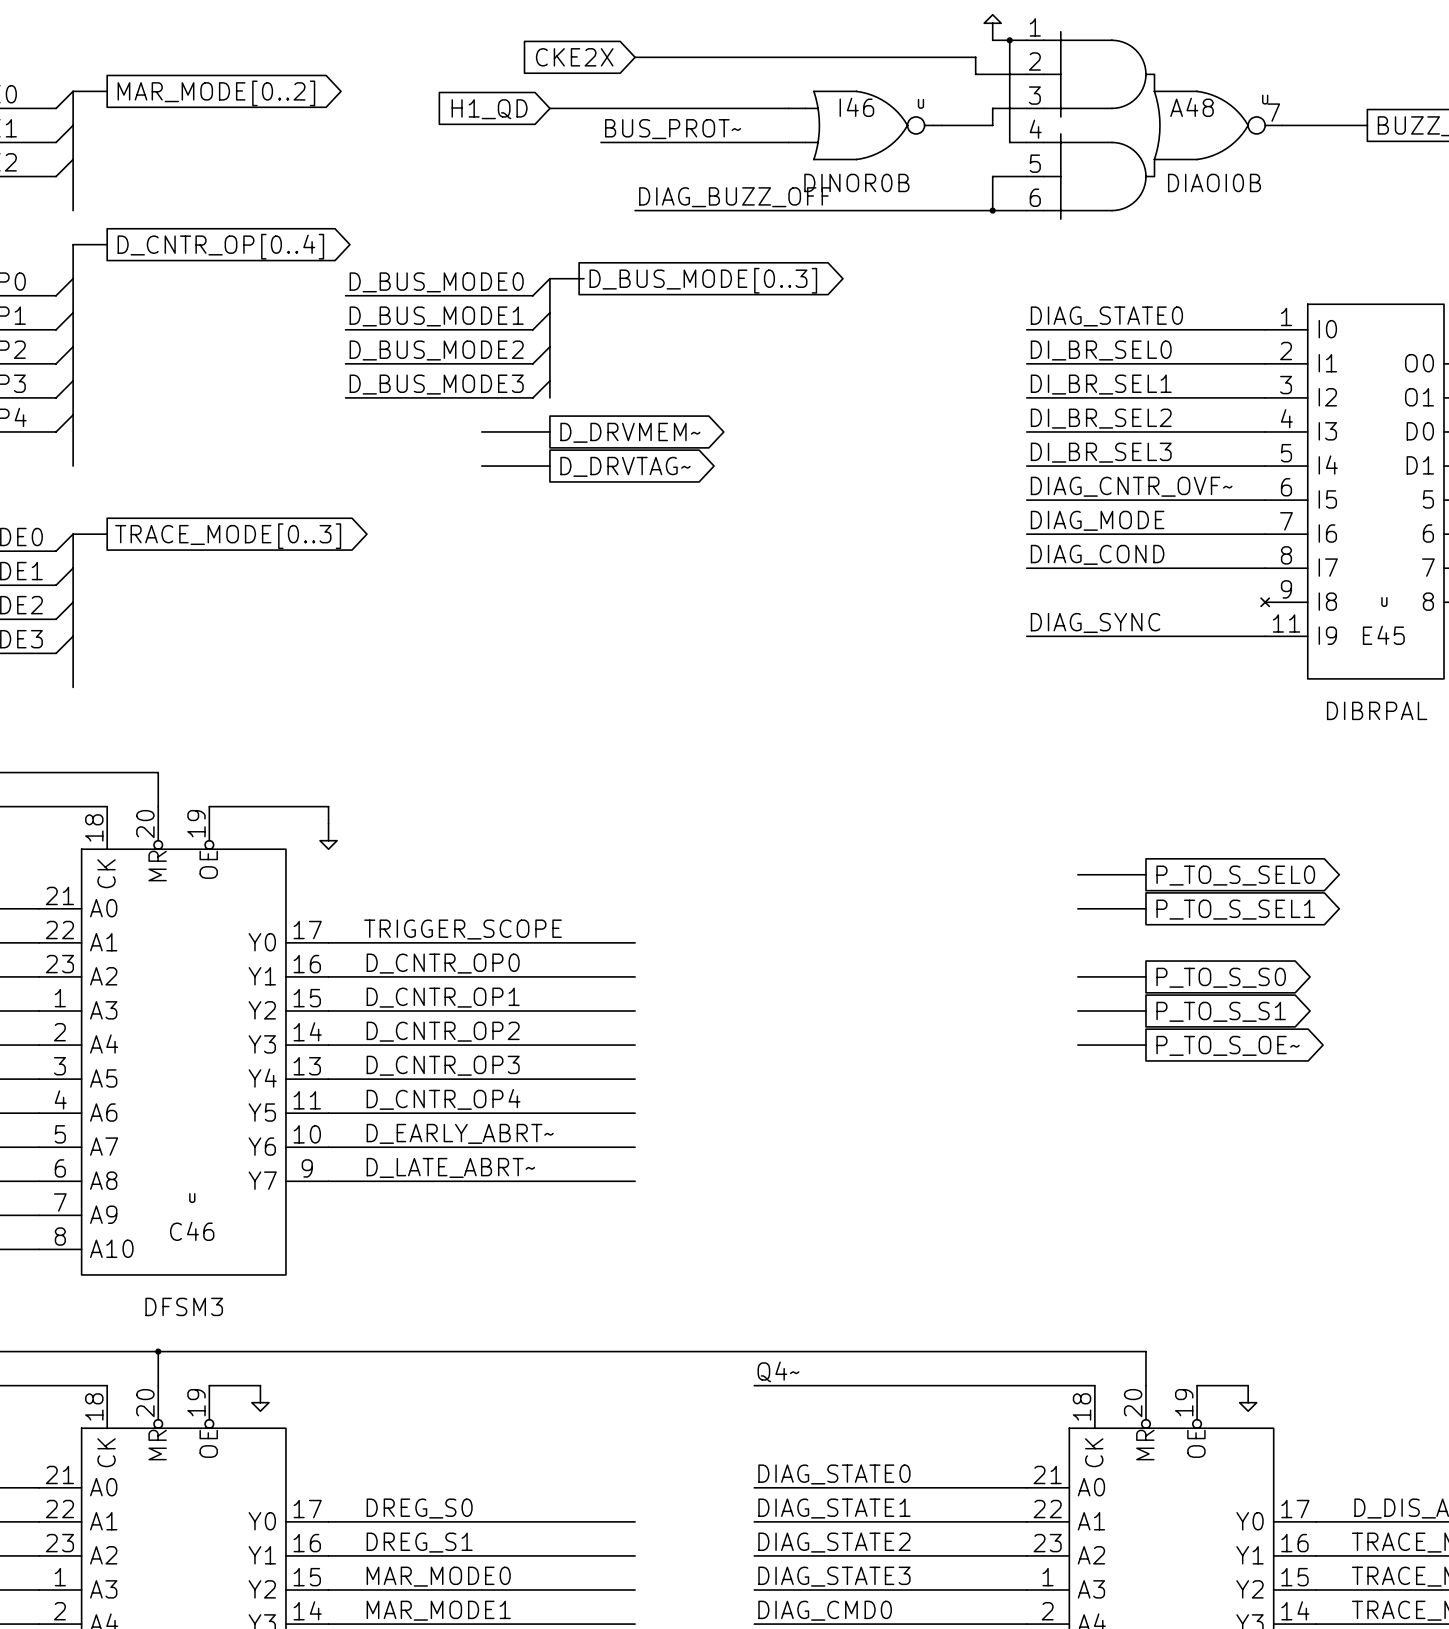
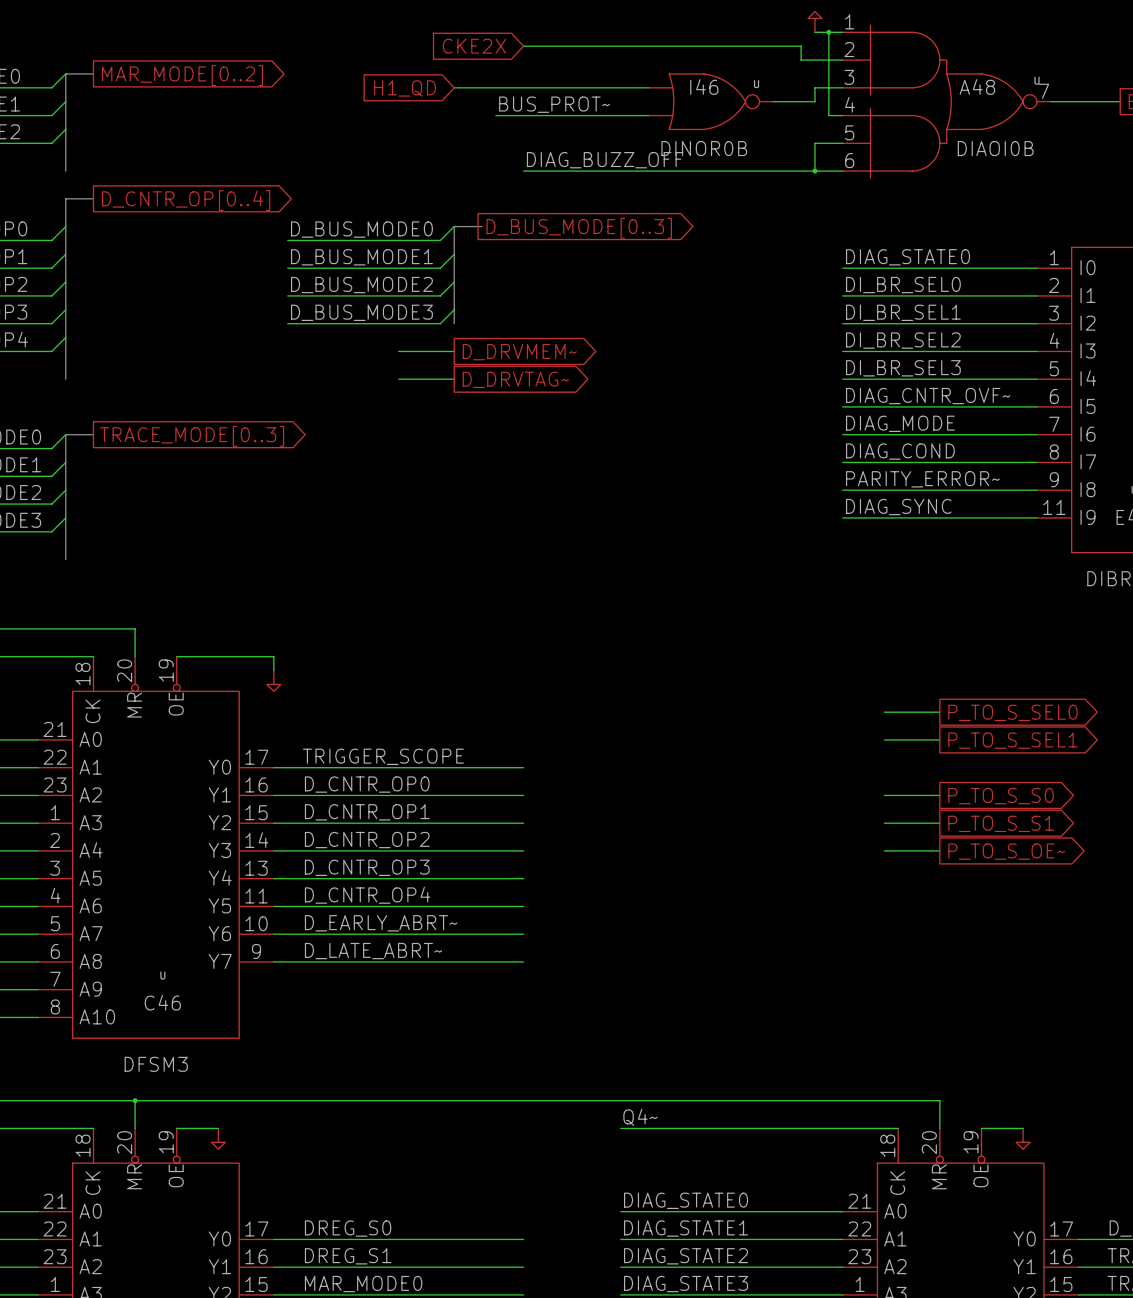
label: none -> PARITY_ERROR~ (922, 479)
wire: none -> (842, 490) (1036, 490)
no-connect mark: (1265, 602) -> none

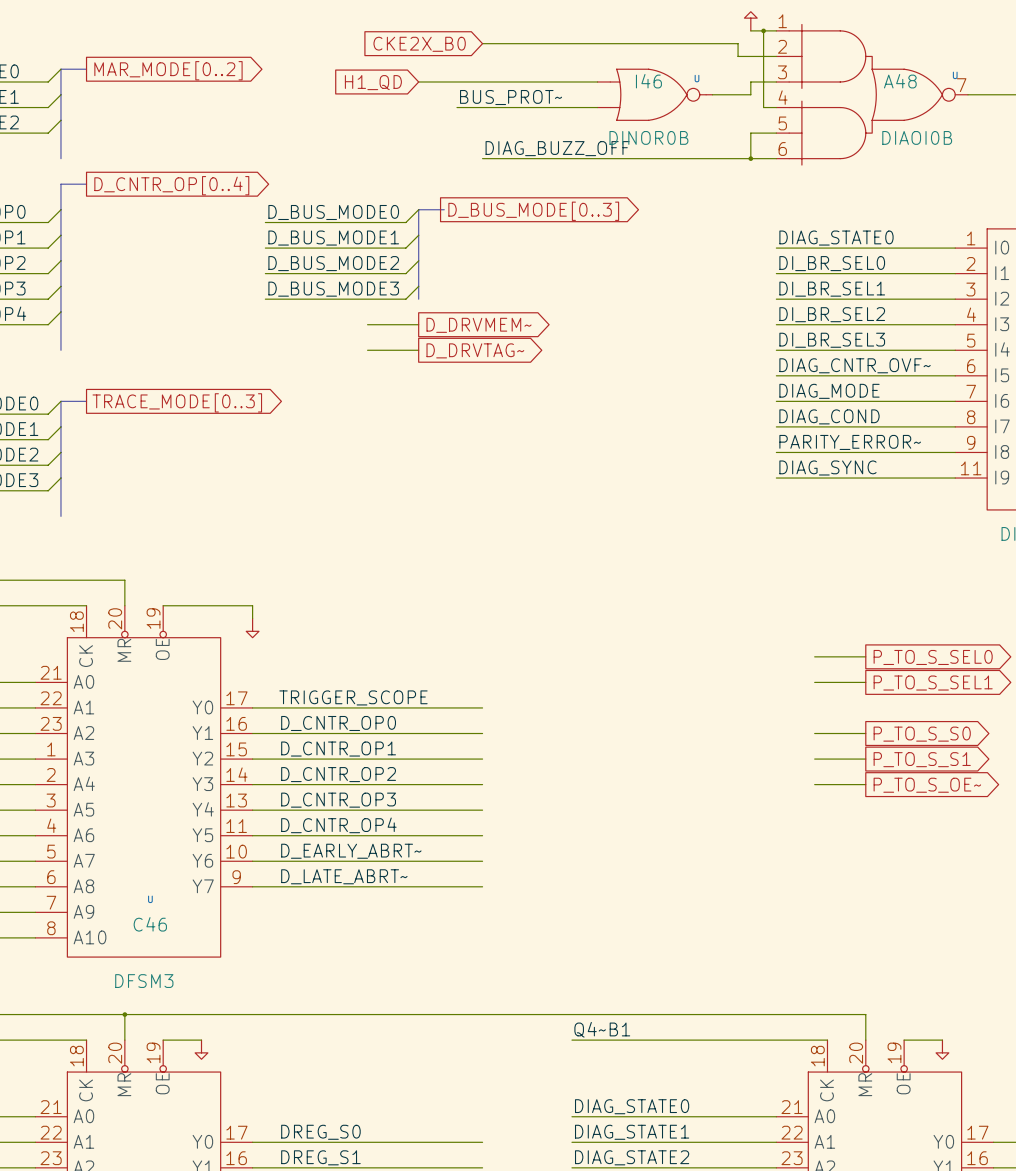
global label: CKE2X (474, 46) -> CKE2X_B0 (419, 44)
label: Q4~ (640, 1117) -> Q4~B1 (602, 1029)

